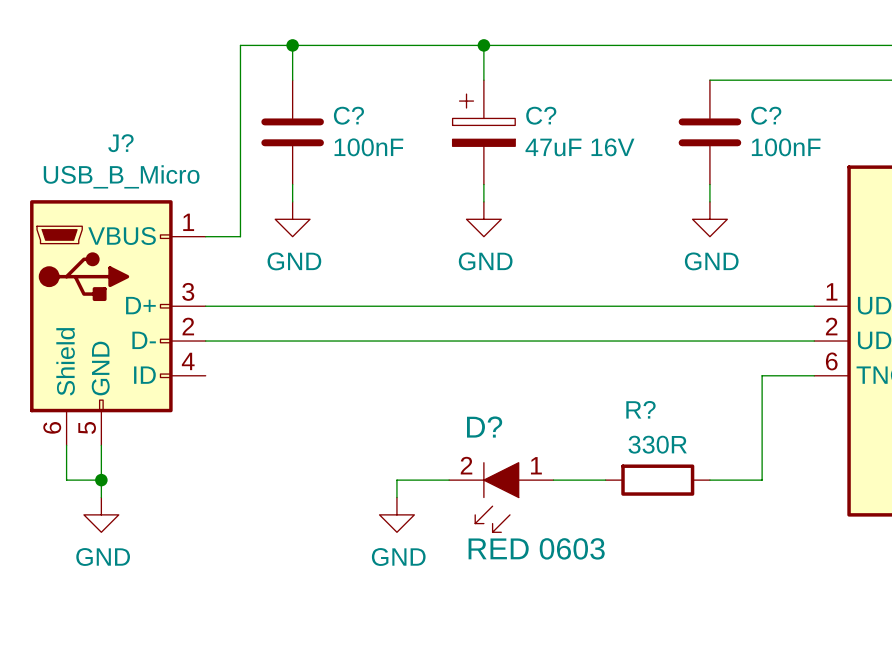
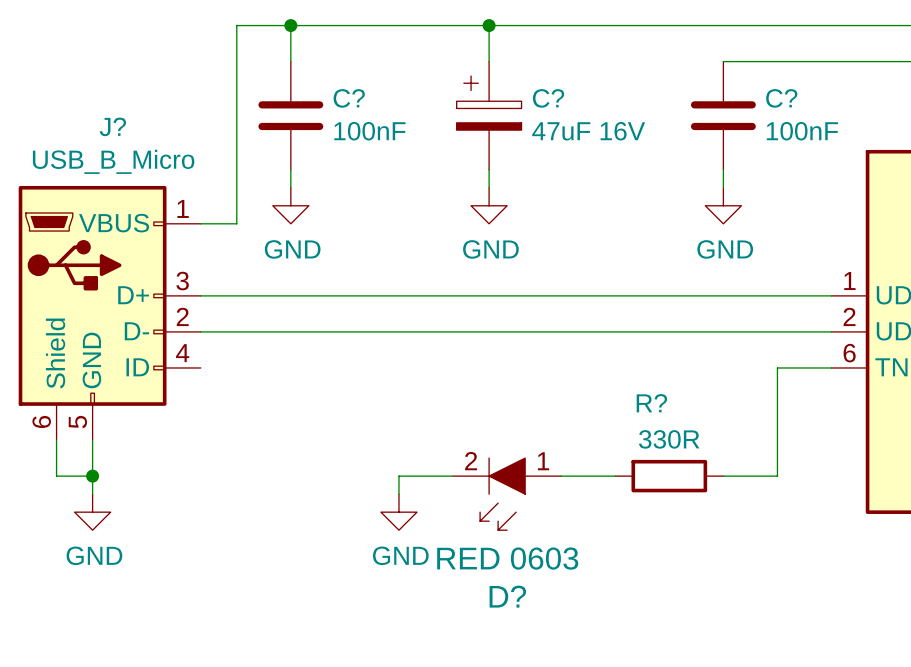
D? name position: D? (484, 427) -> D? (507, 596)
D? value position: RED 0603 (536, 548) -> RED 0603 (507, 558)

